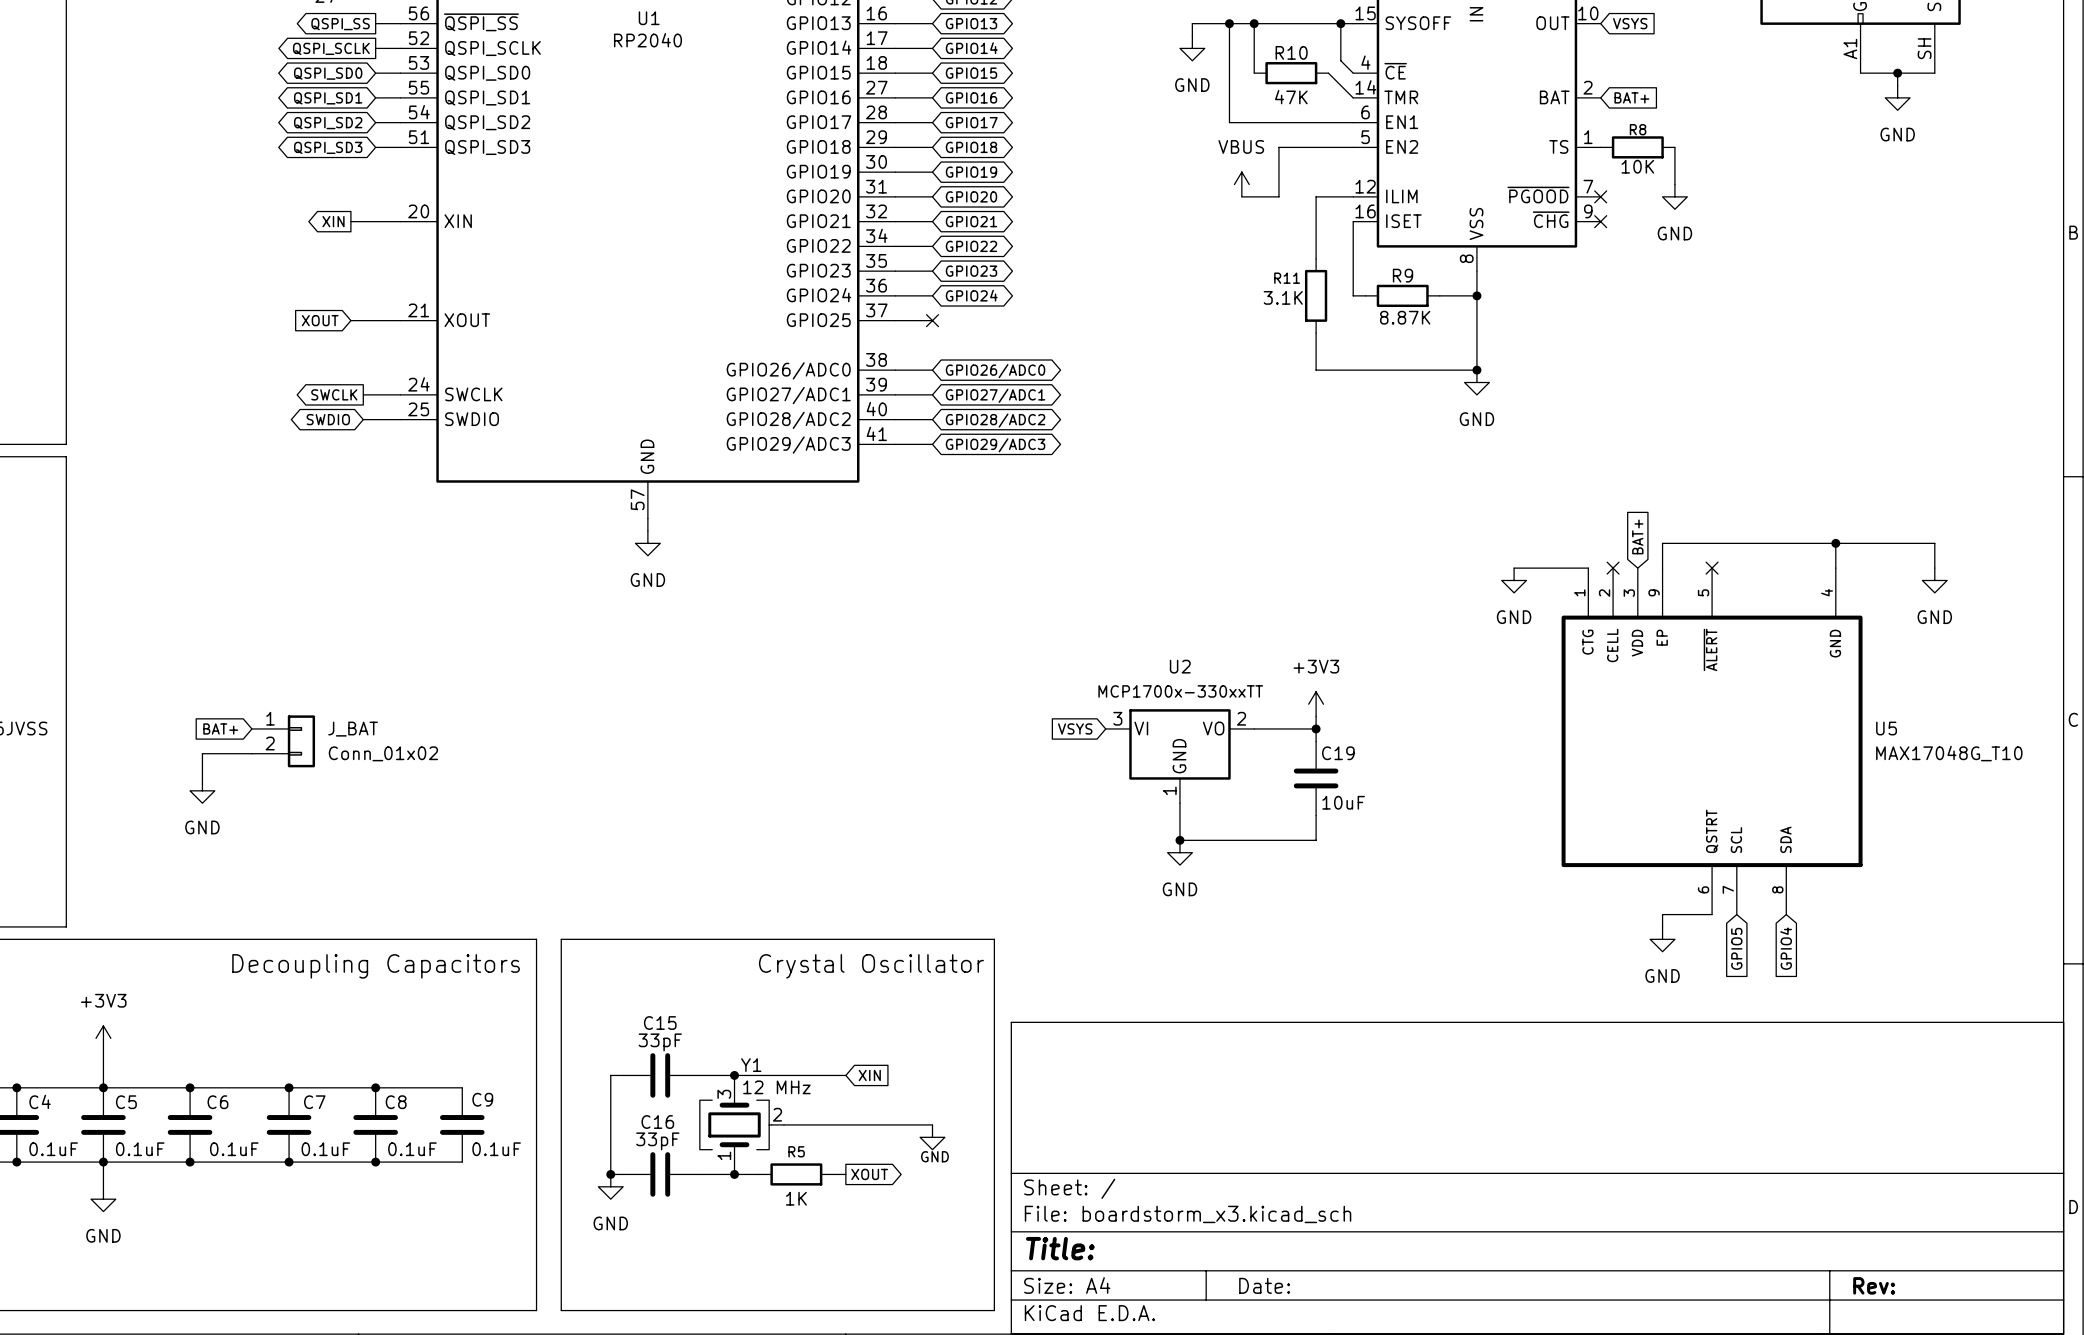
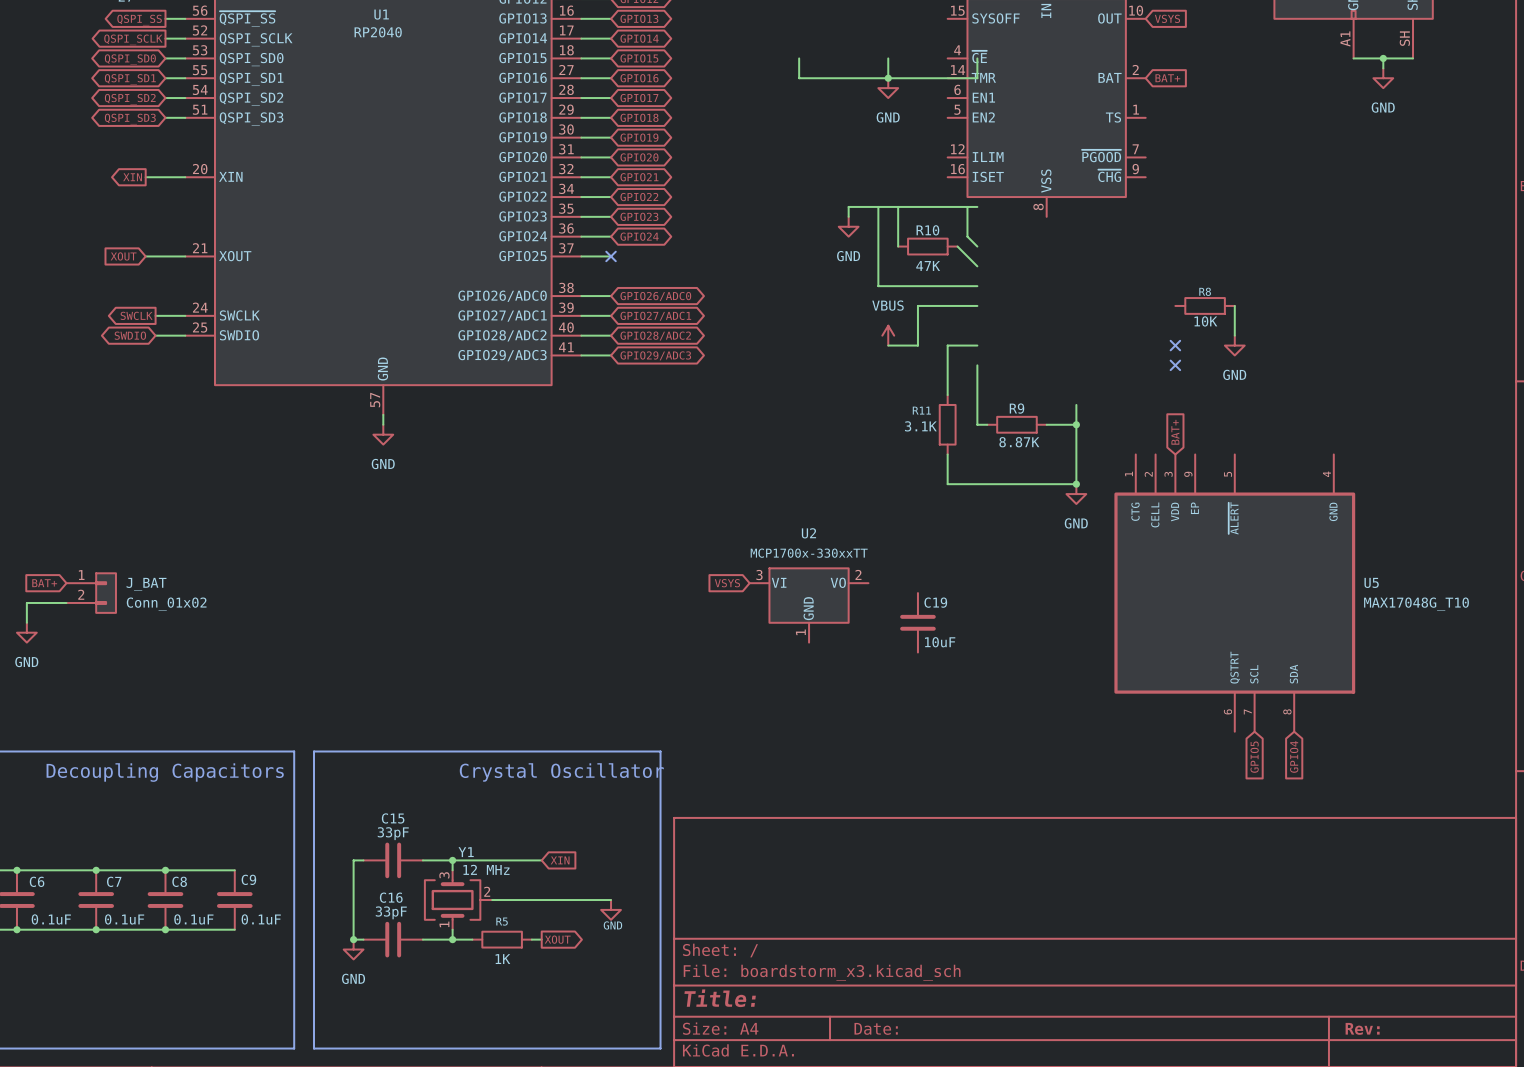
wire: (1229, 23) (1229, 122) (1353, 122) -> (878, 206) (878, 286) (977, 286)
junction: (1229, 23) -> none
wire: (1254, 23) (1254, 73) -> (898, 206) (898, 246)
junction: (1254, 23) -> none
wire: (1340, 23) (1340, 60) (1353, 73) -> (967, 206) (967, 236) (977, 246)
junction: (1340, 23) -> none
wire: (1353, 23) (1192, 23) (1192, 36) -> (977, 206) (848, 206) (848, 216)
power symbol position: GND (1192, 48) -> GND (888, 88)
wire: none -> (799, 58) (799, 78) (977, 78) (977, 58)
wire: none -> (888, 58) (888, 78)
R10 position: (1291, 73) -> (927, 246)
wire: (1328, 73) (1353, 97) -> (957, 246) (977, 266)
junction: none -> (888, 78)
wire: (1353, 147) (1278, 147) (1278, 196) (1241, 196) -> (977, 305) (917, 305) (917, 345) (888, 345)
R8 position: (1637, 147) -> (1205, 305)
wire: (1674, 147) (1674, 184) -> (1234, 305) (1234, 335)
power symbol position: VBUS (1241, 184) -> VBUS (888, 335)
wire: (1353, 196) (1316, 196) (1316, 258) -> (977, 345) (947, 345) (947, 395)
no-connect mark: (1600, 196) -> none
power symbol: GND (1674, 196) -> none
wire: (1353, 221) (1353, 295) (1365, 295) -> (977, 365) (977, 424) (987, 424)
no-connect mark: (1600, 221) -> none
wire: (1476, 271) (1476, 370) (1316, 370) (1316, 333) -> (1076, 404) (1076, 484) (947, 484) (947, 454)
power symbol: none -> GND (848, 226)
R11 position: (1316, 295) -> (947, 424)
R9 position: (1402, 295) -> (1016, 424)
wire: (1439, 295) (1476, 295) -> (1046, 424) (1076, 424)
junction: (1476, 295) -> none
junction: (1476, 370) -> none
power symbol: GND (1476, 382) -> none
no-connect mark: none -> (1175, 345)
power symbol: none -> GND (1234, 345)
no-connect mark: none -> (1175, 365)
junction: none -> (1076, 424)
wire: (1835, 543) (1835, 568) -> none
junction: (1835, 543) -> none
wire: (1514, 568) (1588, 568) -> none
no-connect mark: (1613, 568) -> none
wire: (1662, 568) (1662, 543) (1934, 543) (1934, 568) -> none
no-connect mark: (1712, 568) -> none
power symbol position: GND (1514, 580) -> GND (1076, 494)
power symbol: GND (1934, 580) -> none
junction: none -> (1076, 484)
power symbol: +3V3 (1316, 704) -> none
wire: (1316, 716) (1316, 741) -> none
wire: (1254, 728) (1316, 728) -> none
junction: (1316, 728) -> none
wire: (1179, 803) (1179, 840) (1316, 840) (1316, 815) -> none
junction: (1179, 840) -> none
power symbol: GND (1179, 852) -> none
wire: (1712, 914) (1662, 914) (1662, 926) -> none
power symbol: GND (1662, 939) -> none

